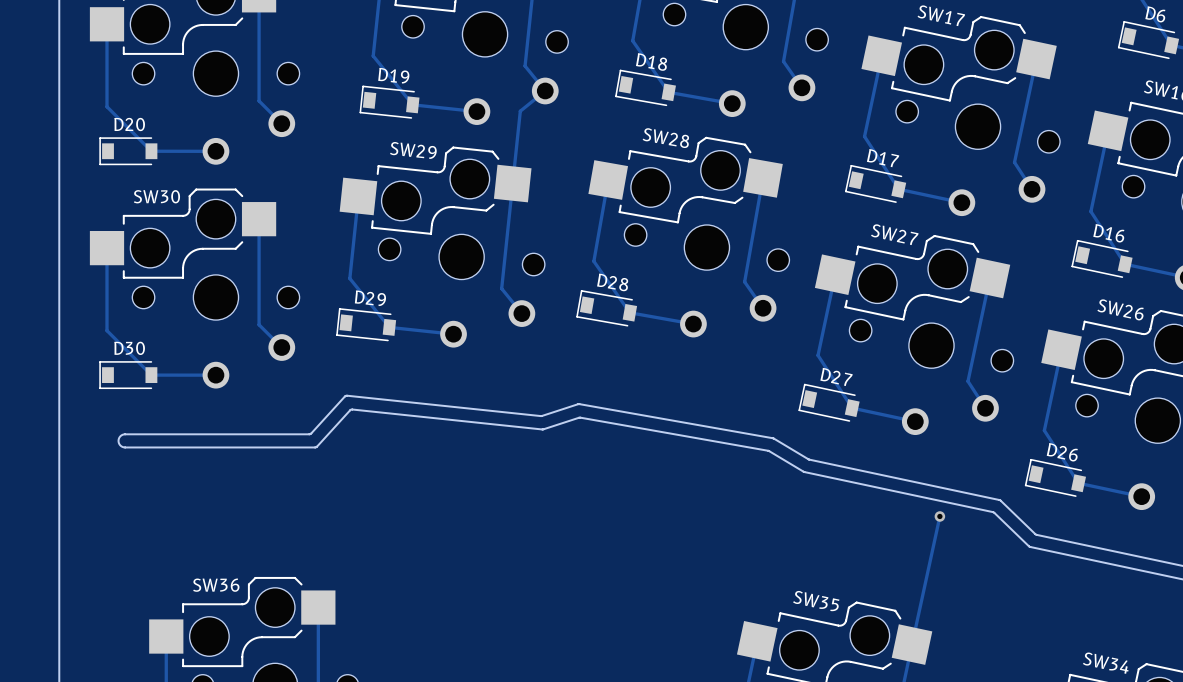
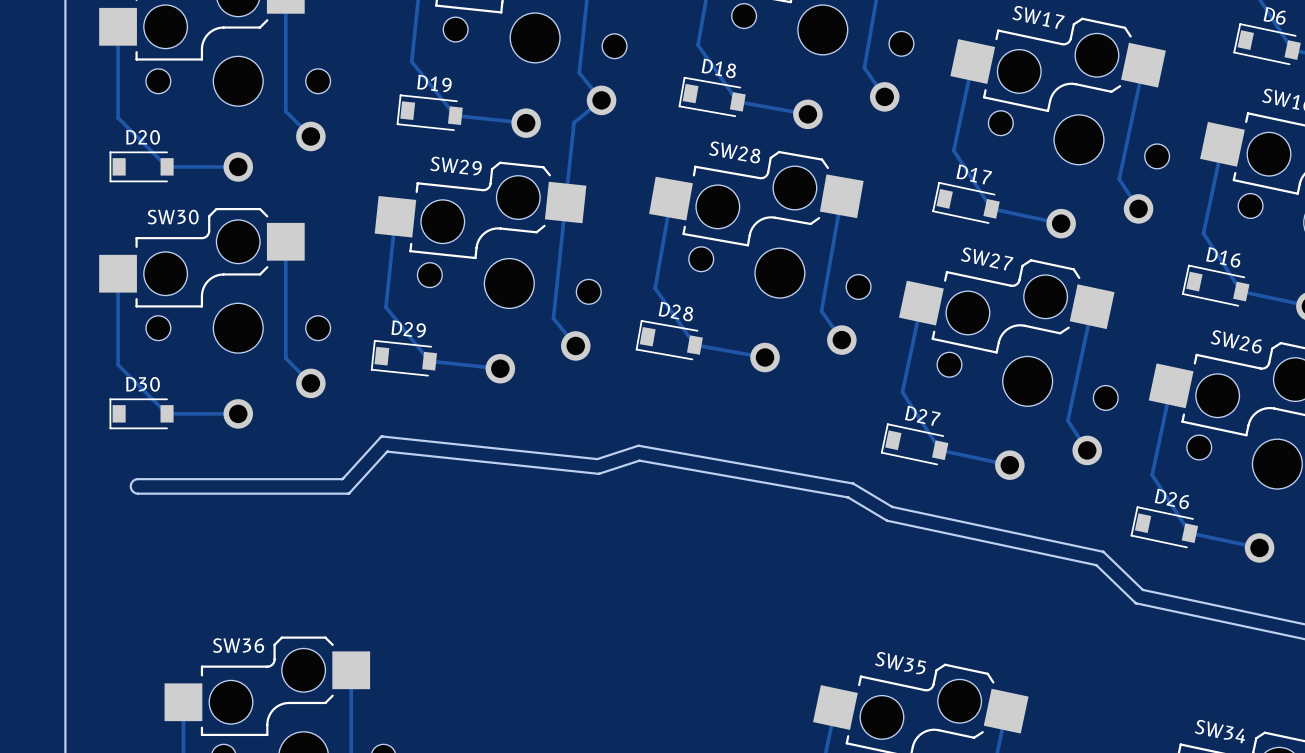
track: (939, 516) (912, 644) -> none
via: (939, 516) -> none

